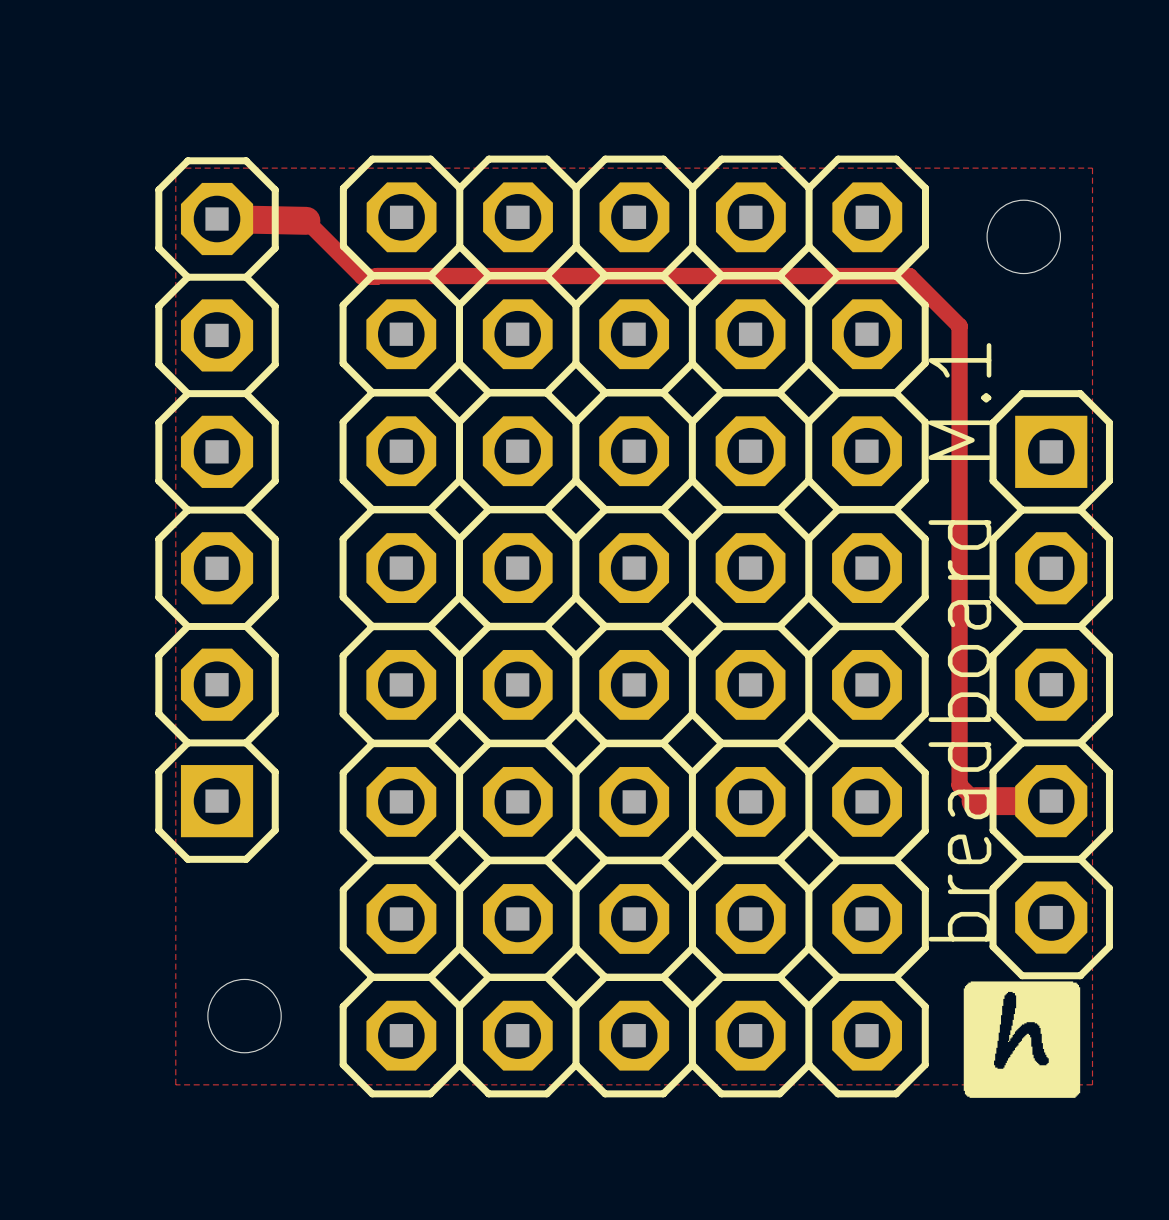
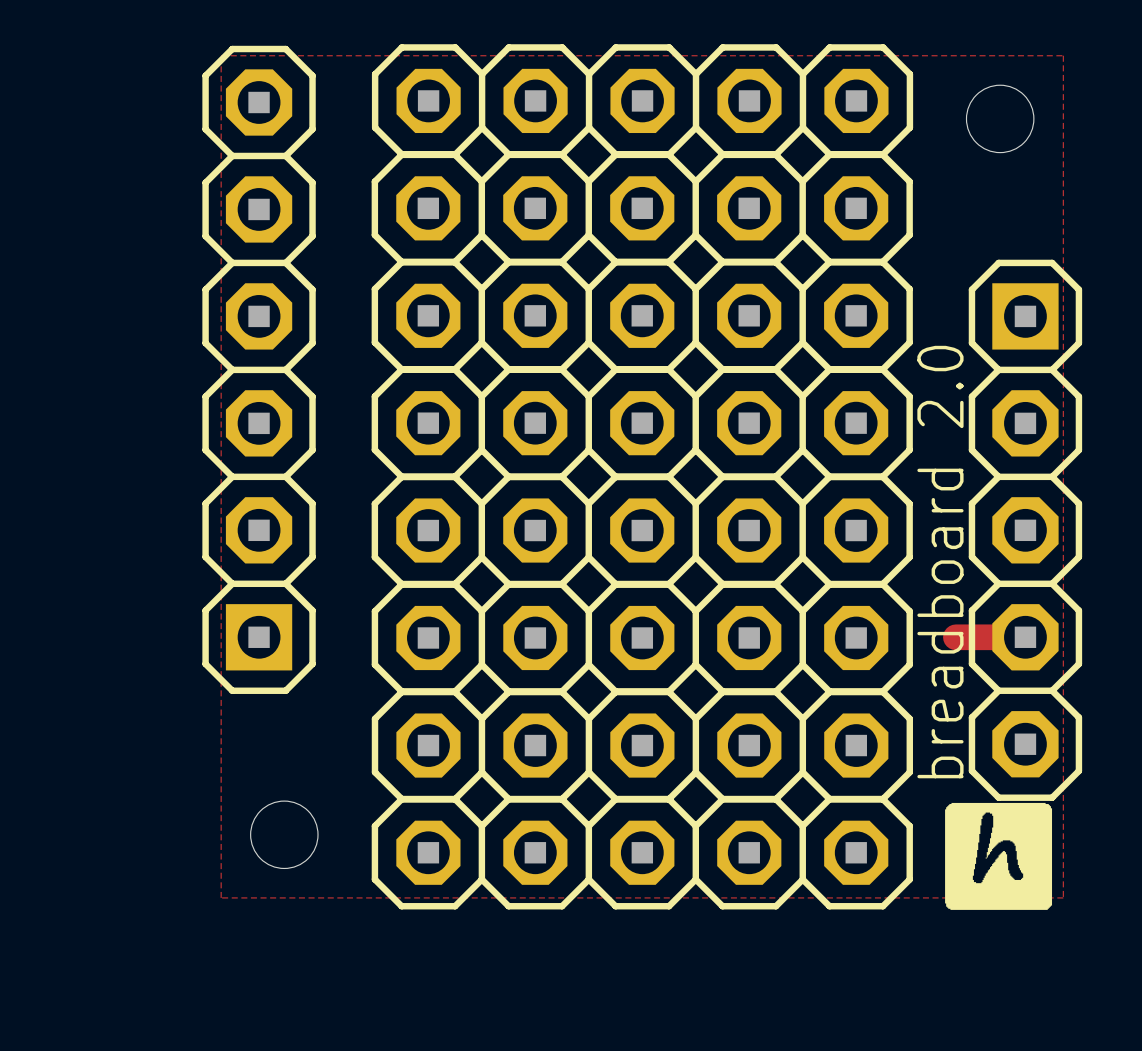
track: (217, 219) (306, 220) (362, 276) (909, 276) (959, 326) (959, 785) (975, 801) -> none
text: breadboard M.1 (959, 642) -> breadboard 2.0 (940, 562)

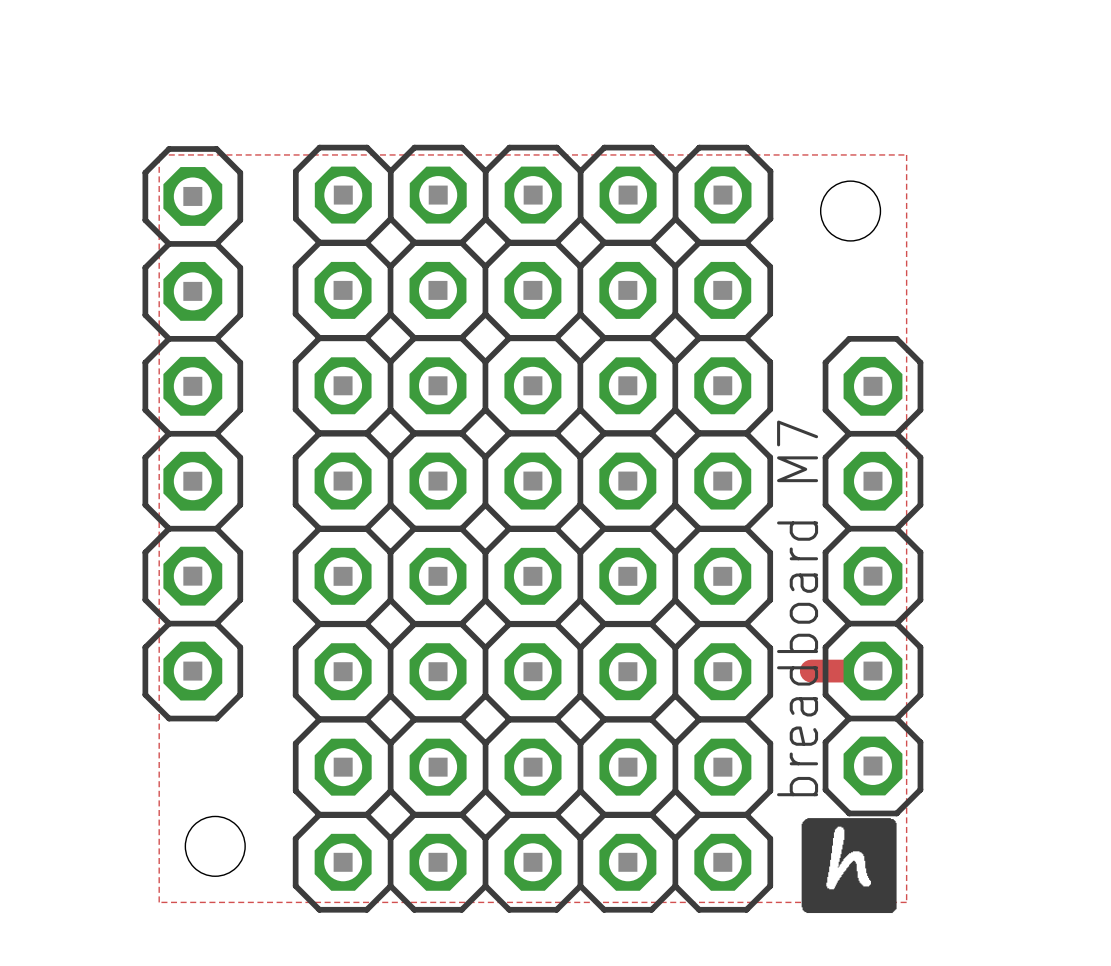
part footprint: [202, 45, 316, 694] -> [142, 146, 244, 722]
part footprint: [968, 259, 1083, 801] -> [822, 335, 924, 817]
text: breadboard 2.0 (940, 562) -> breadboard M7 (797, 608)

